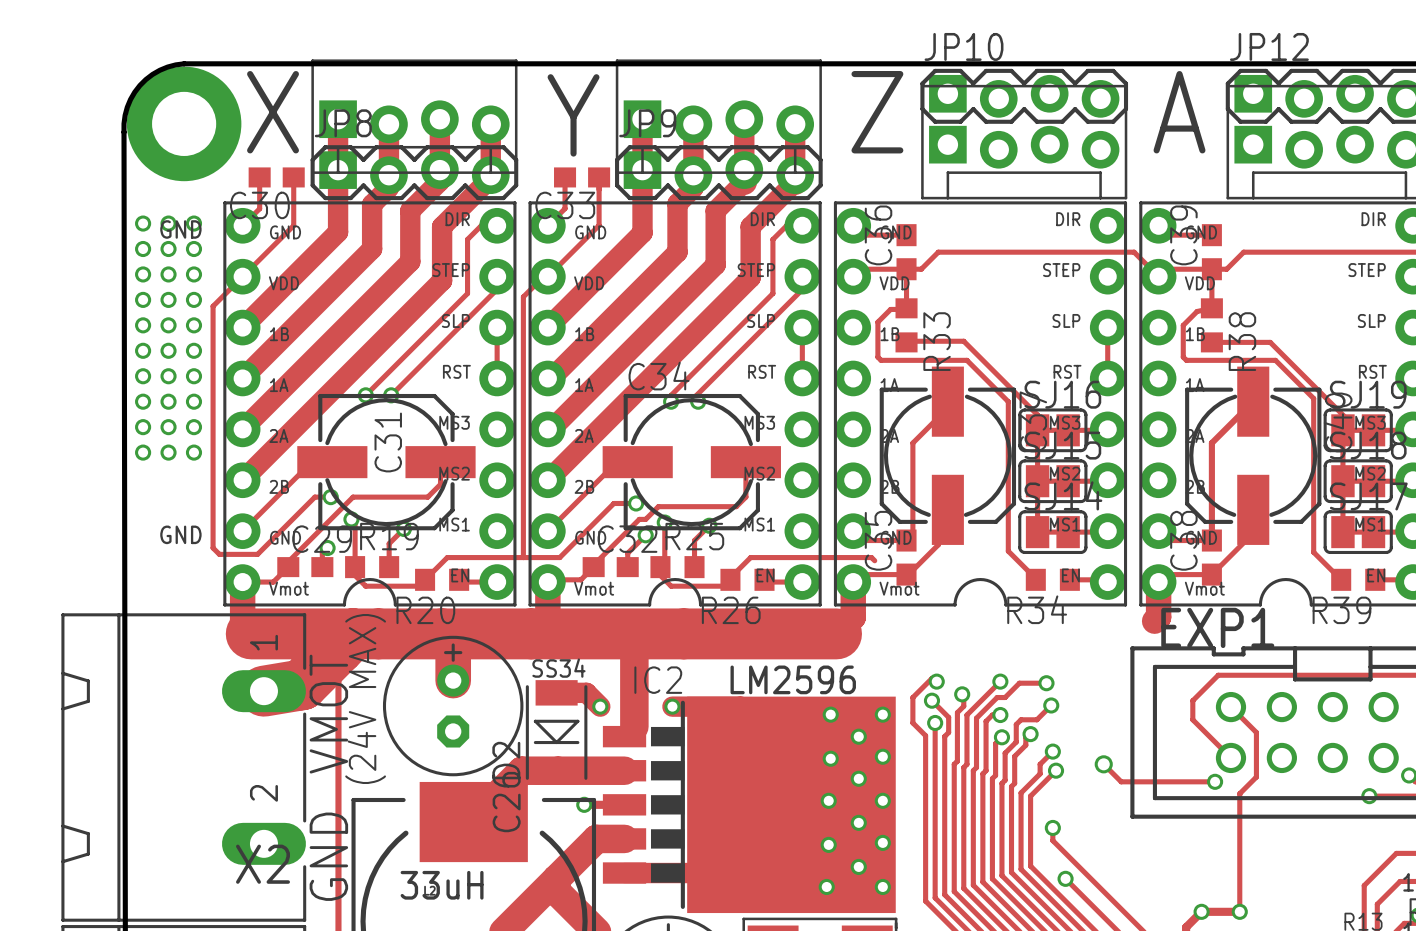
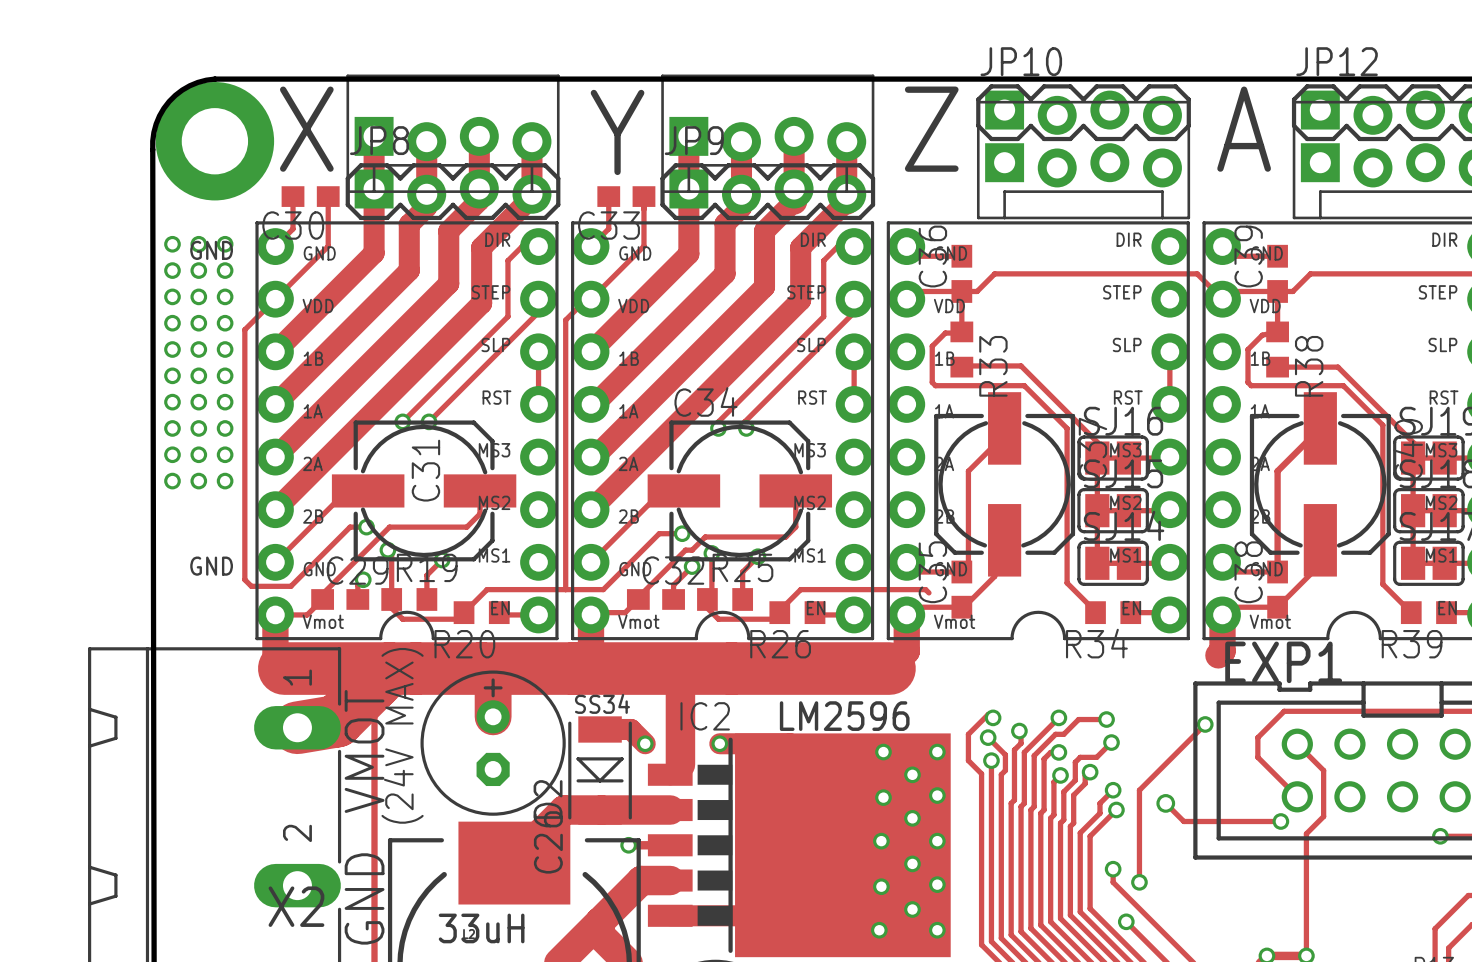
track: none -> (1205, 724) (1139, 790) (1139, 882)
via: none -> (1205, 724)
via: none -> (1139, 882)

